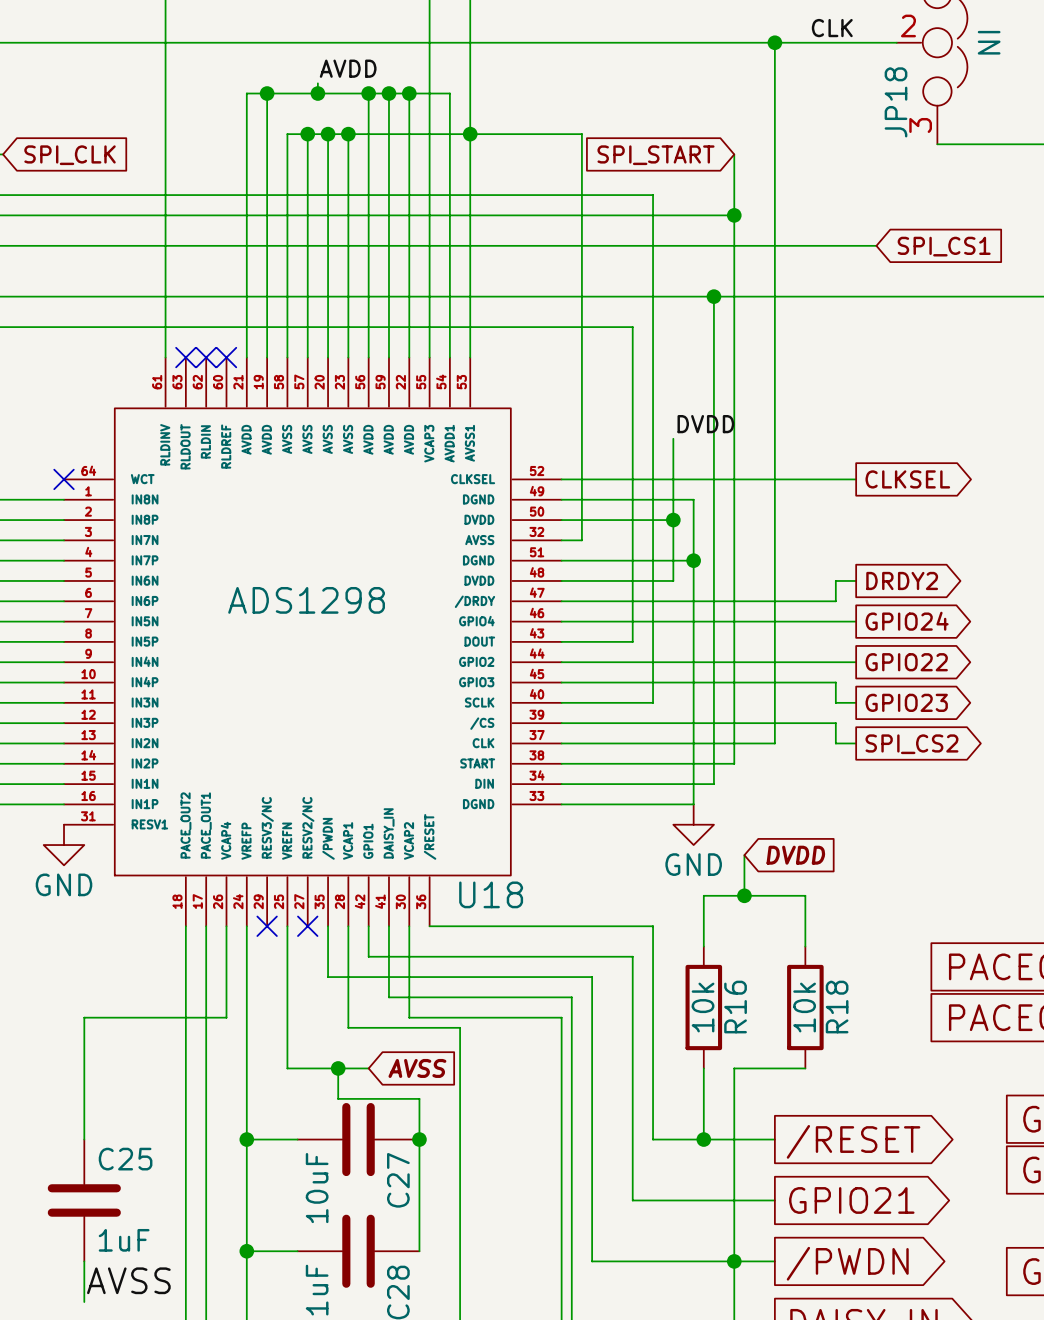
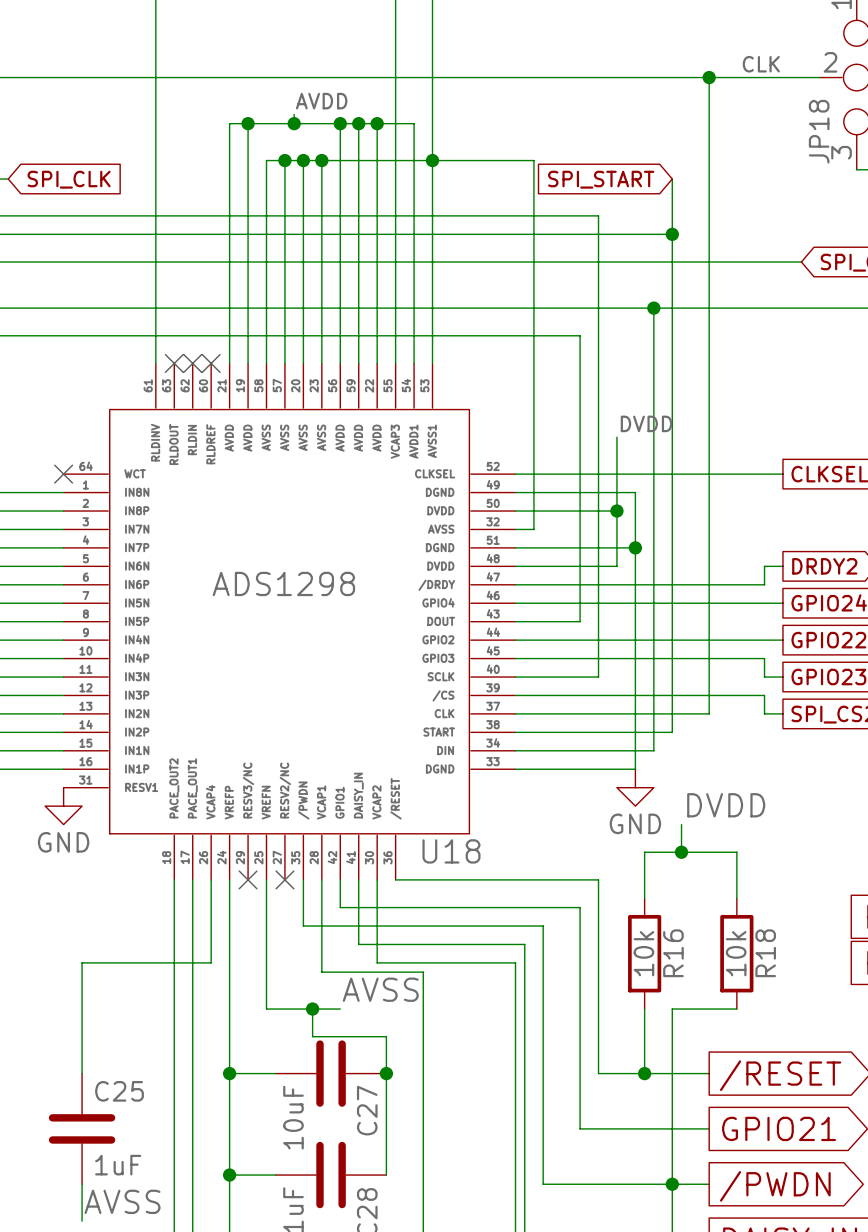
label: none -> DVDD (726, 805)
wire: (744, 855) (744, 865) -> none
global label: DVDD (795, 855) -> none
label: none -> AVSS (380, 989)
global label: AVSS (417, 1068) -> none

